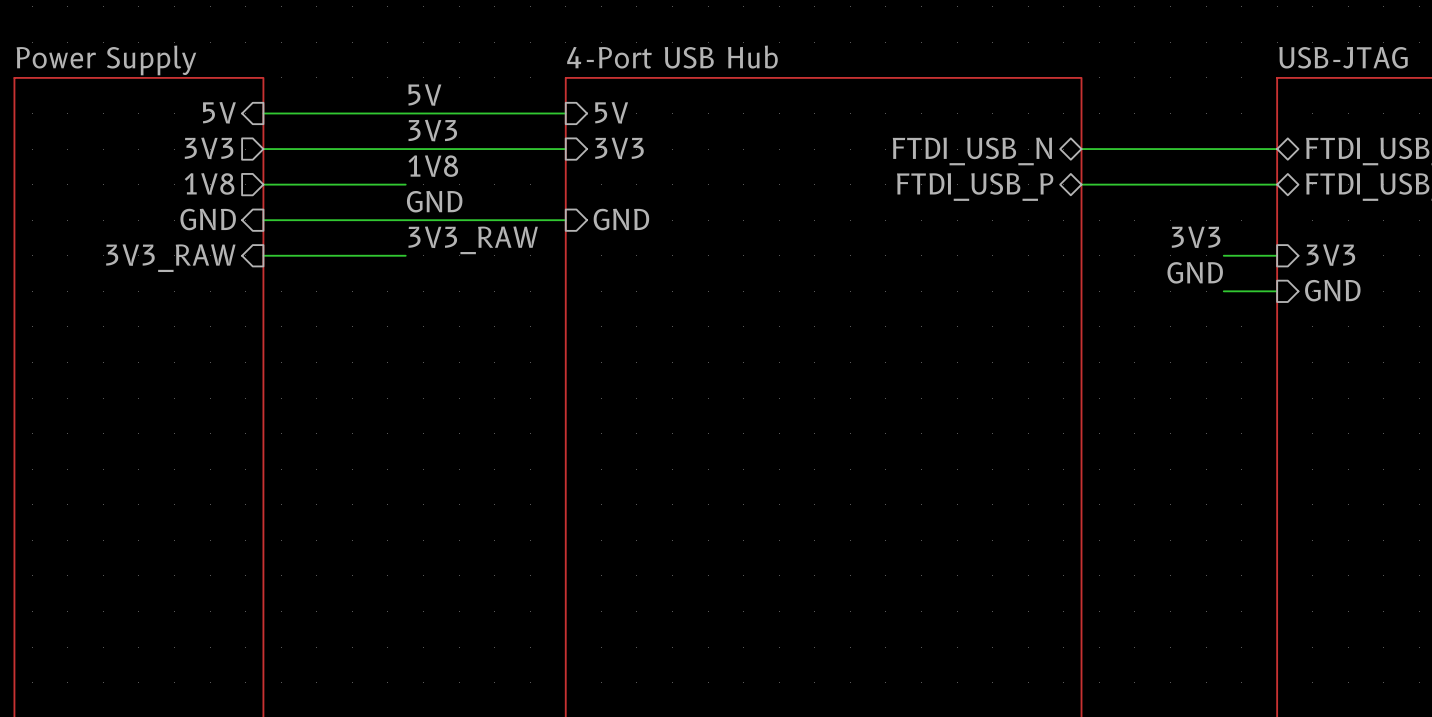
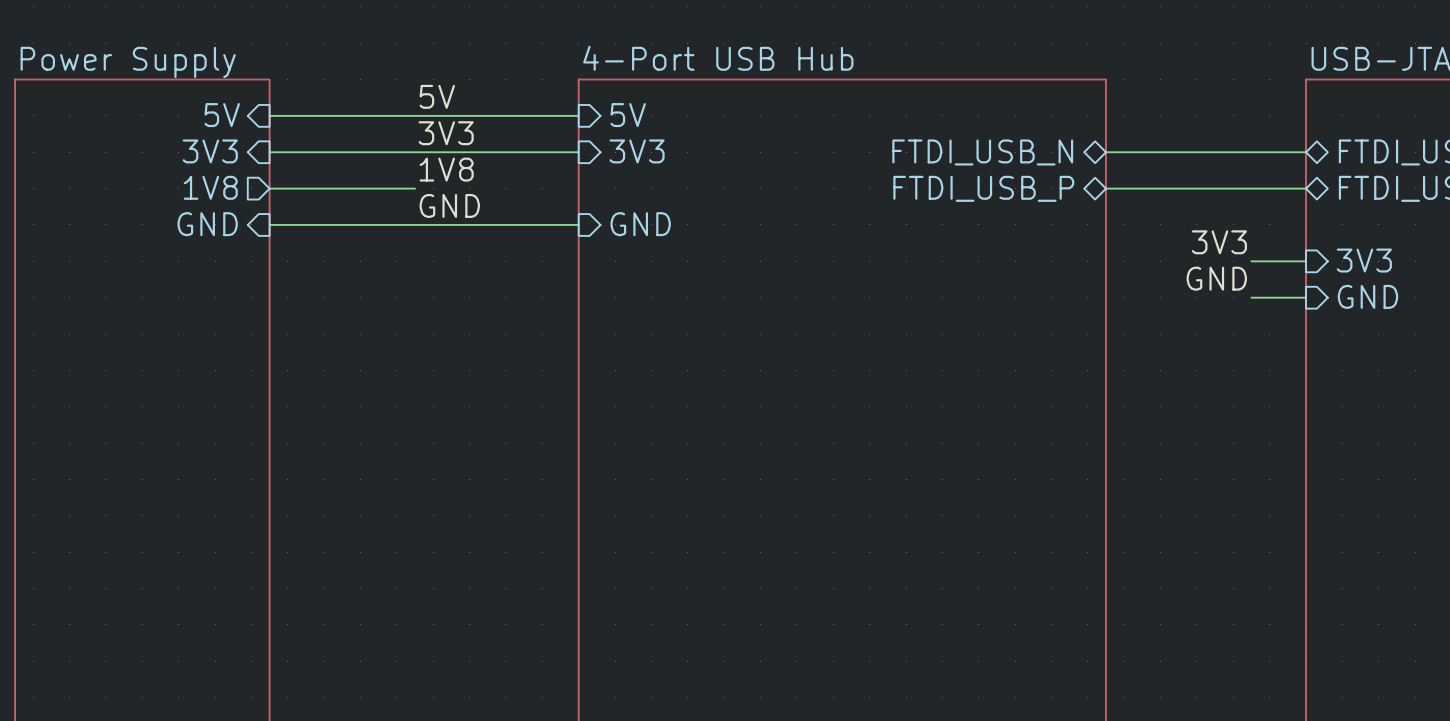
sheet pin shape: output (209, 148) -> input (210, 151)
label: 3V3_RAW (473, 240) -> none
wire: (263, 255) (405, 255) -> none
sheet pin: 3V3_RAW (170, 258) -> none

